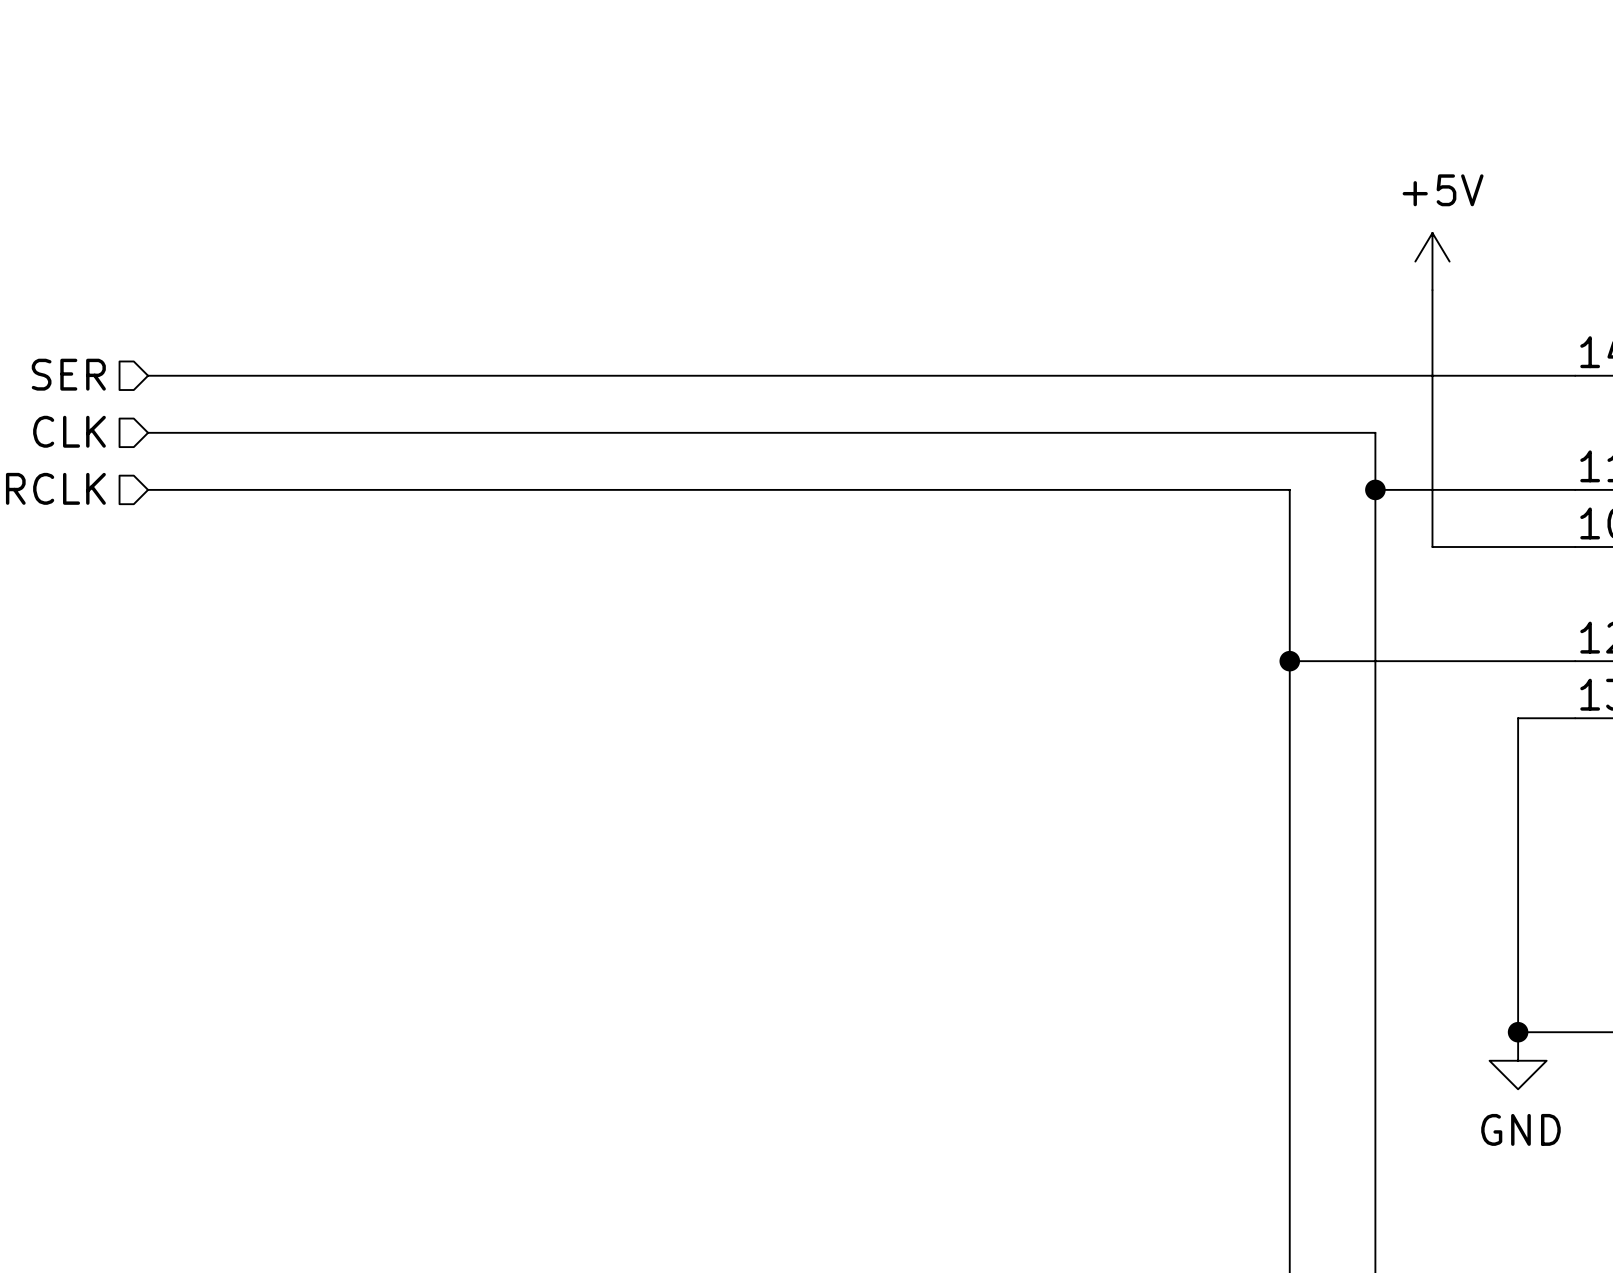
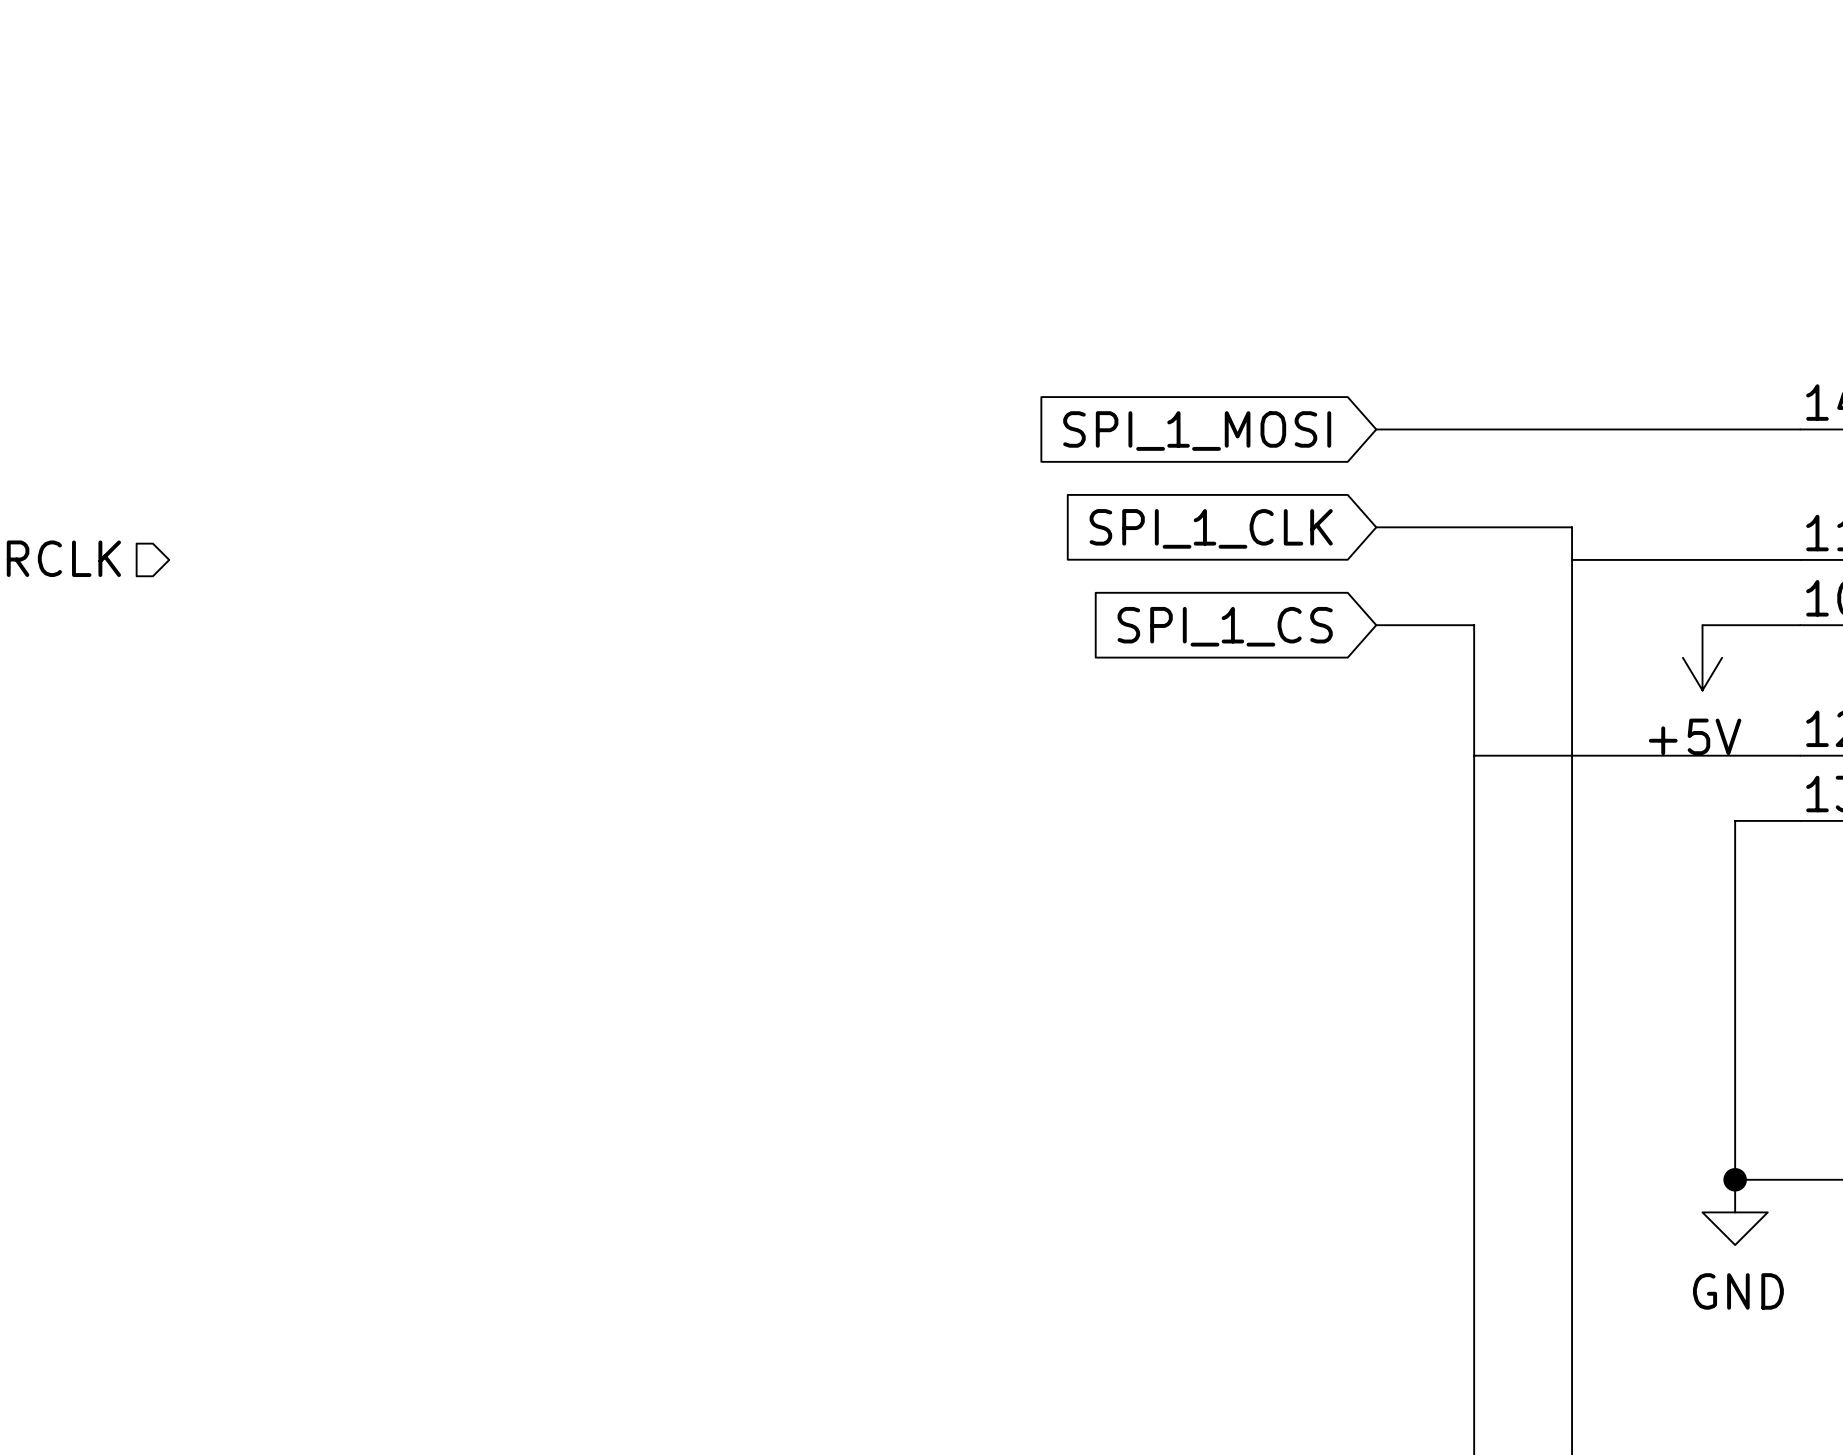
power symbol: +5V (1432, 261) -> none
wire: (1432, 290) (1432, 547) (1489, 547) -> none
hierarchical label: SER (68, 374) -> none
wire: (148, 375) (1204, 375) -> none
global label: none -> SPI_1_MOSI (1197, 431)
hierarchical label: CLK (69, 431) -> none
wire: (148, 432) (1375, 432) (1375, 461) -> (1376, 527) (1572, 527)
global label: none -> SPI_1_CLK (1211, 528)
wire: (148, 489) (1289, 489) (1289, 547) -> (1376, 625) (1474, 625)
junction: (1375, 489) -> none
global label: none -> SPI_1_CS (1225, 626)
power symbol: none -> +5V (1702, 657)
junction: (1289, 661) -> none

